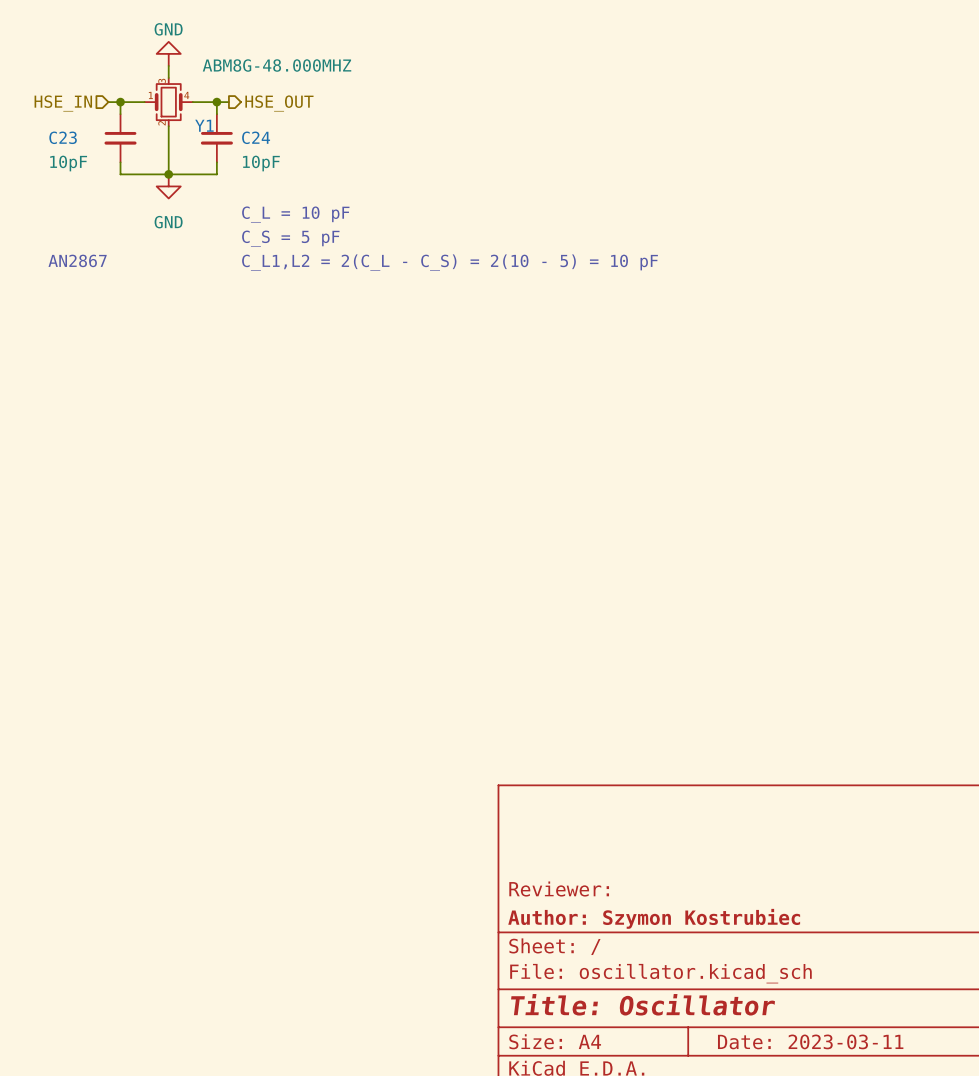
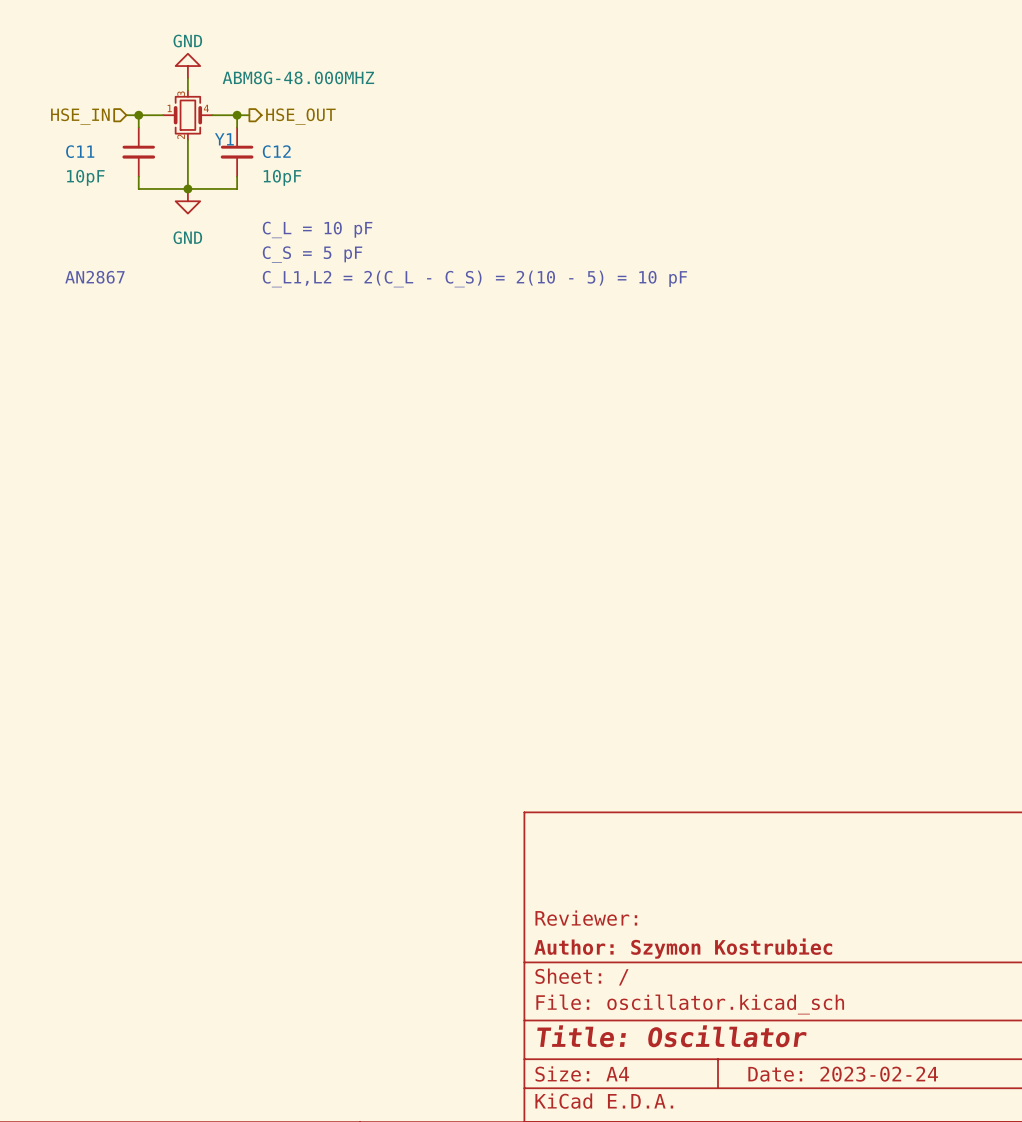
C23 name: C23 (63, 137) -> C11 (80, 151)
C24 name: C24 (256, 137) -> C12 (276, 151)
title block: Date: 2023-03-11 (810, 1041) -> Date: 2023-02-24 (843, 1074)

